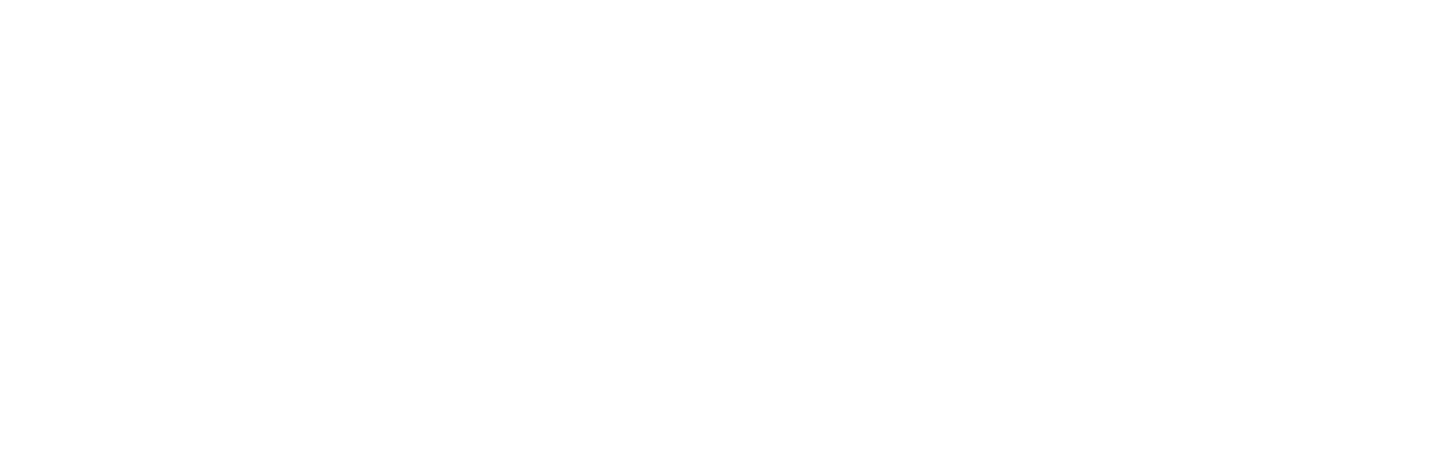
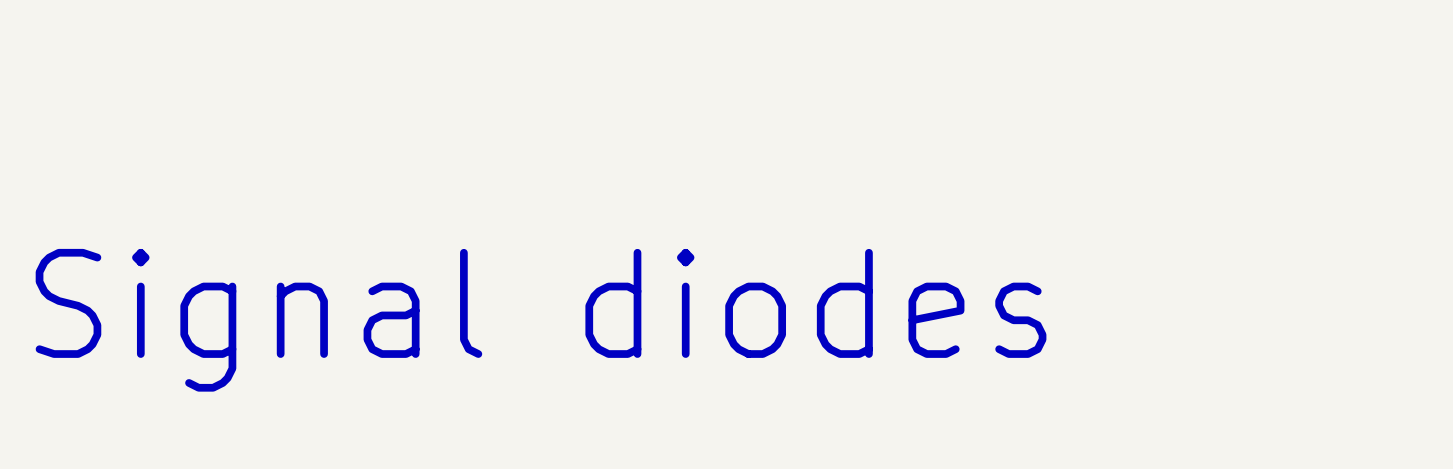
text: none -> Signal diodes (541, 320)

